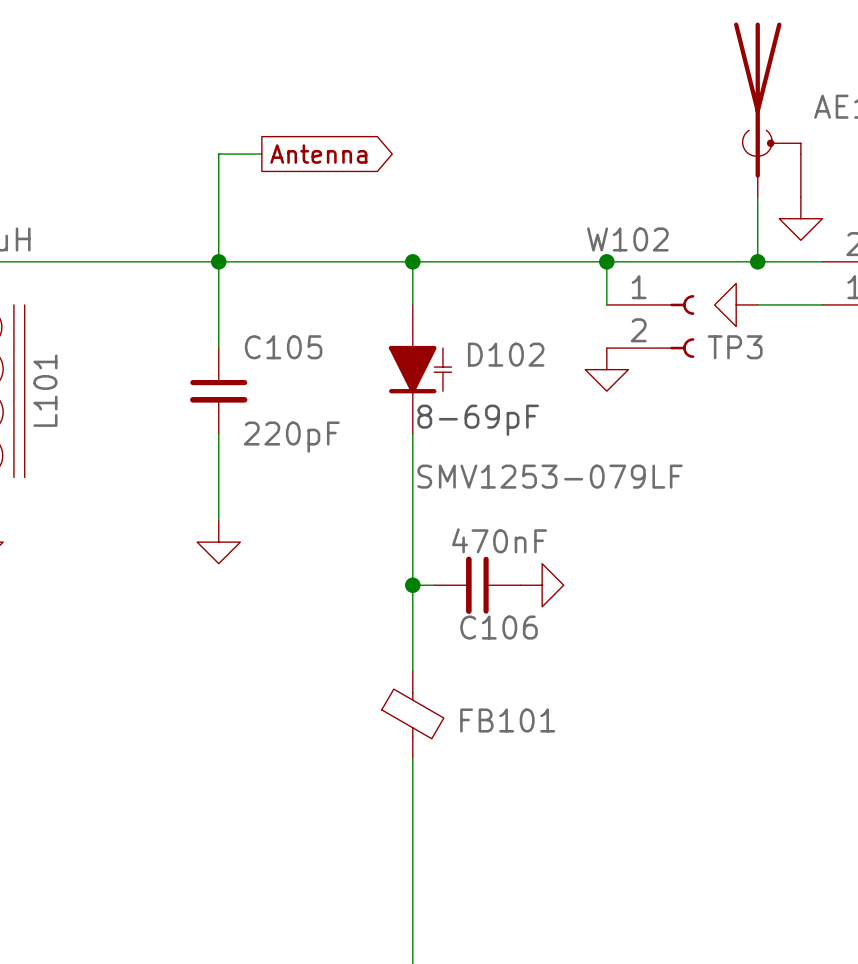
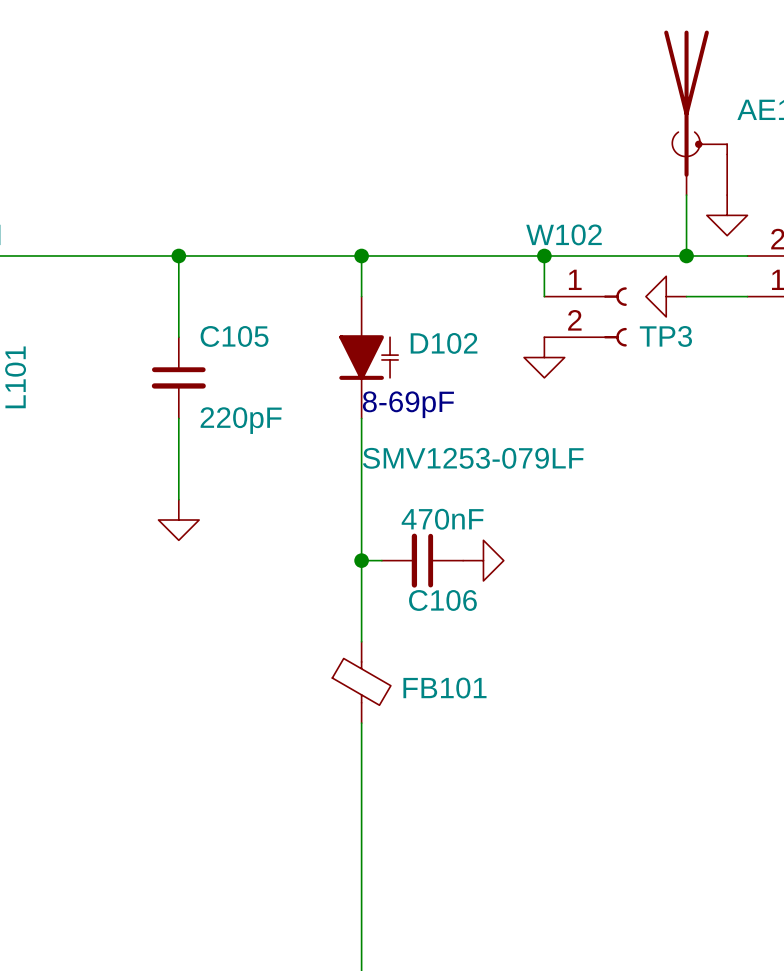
wire: (261, 154) (218, 154) (218, 261) -> none
global label: Antenna (318, 154) -> none

